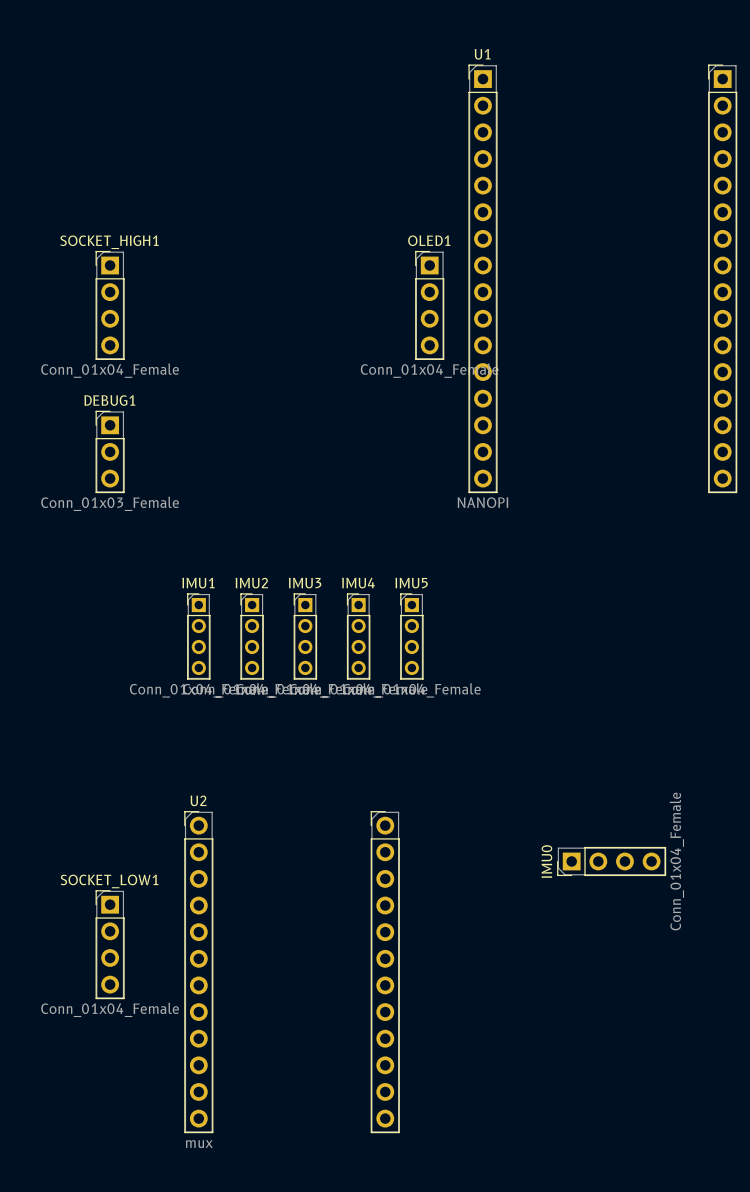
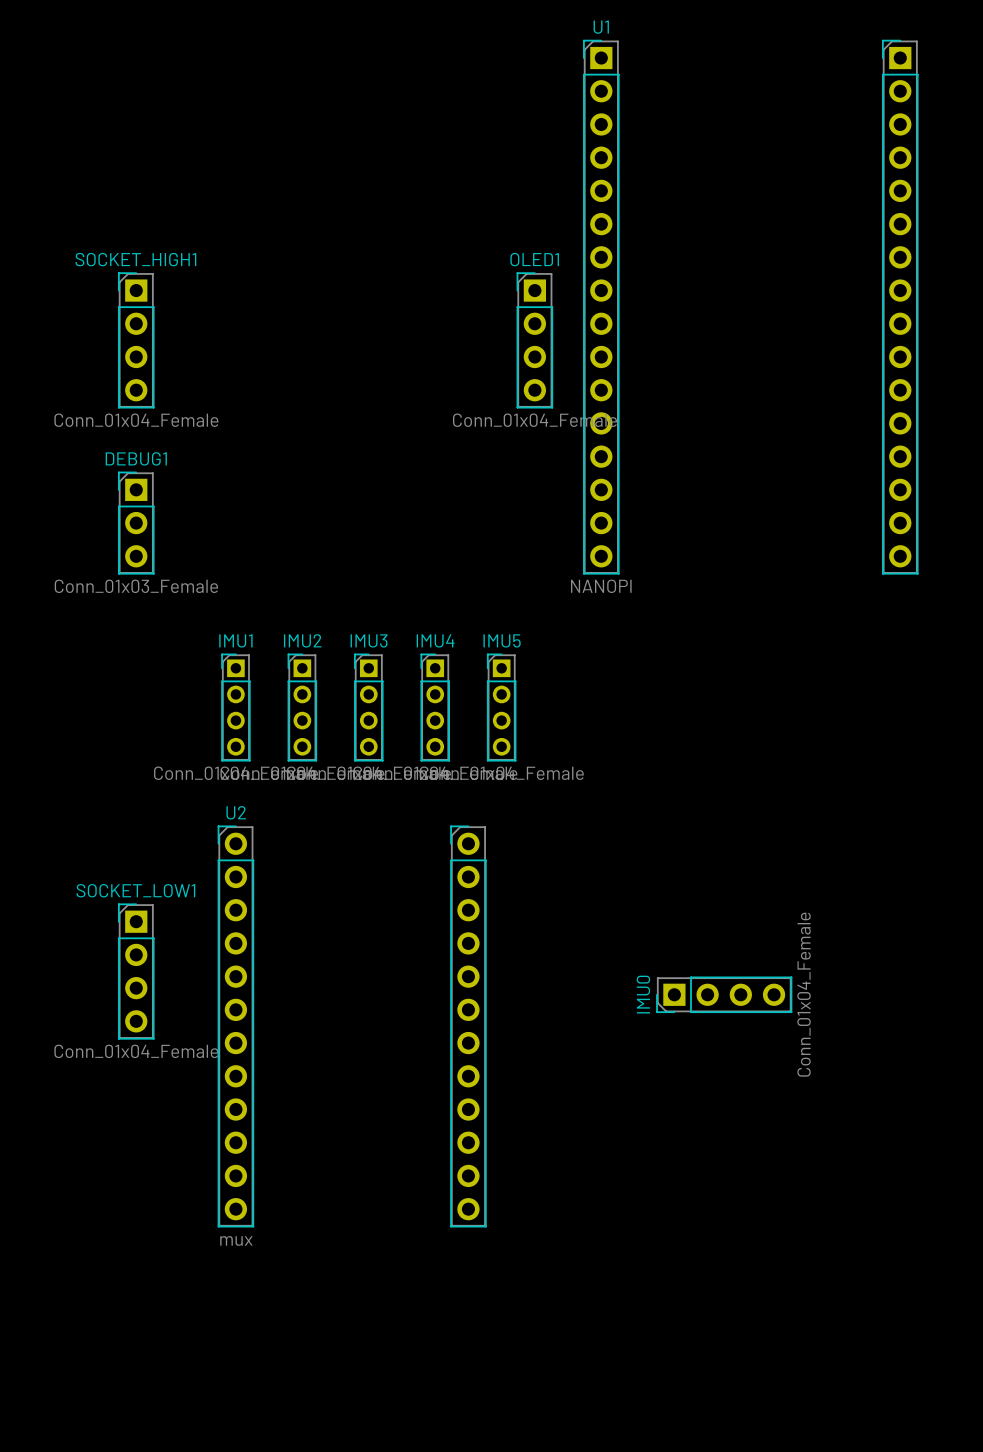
IMU1 position: (198, 636) -> (235, 707)
IMU2 position: (252, 636) -> (302, 707)
IMU3 position: (305, 636) -> (368, 707)
IMU4 position: (358, 636) -> (435, 707)
IMU5 position: (411, 636) -> (501, 707)
IMU0 position: (611, 861) -> (724, 994)
SOCKET_LOW1 position: (110, 944) -> (136, 971)
U2 position: (292, 972) -> (352, 1026)

